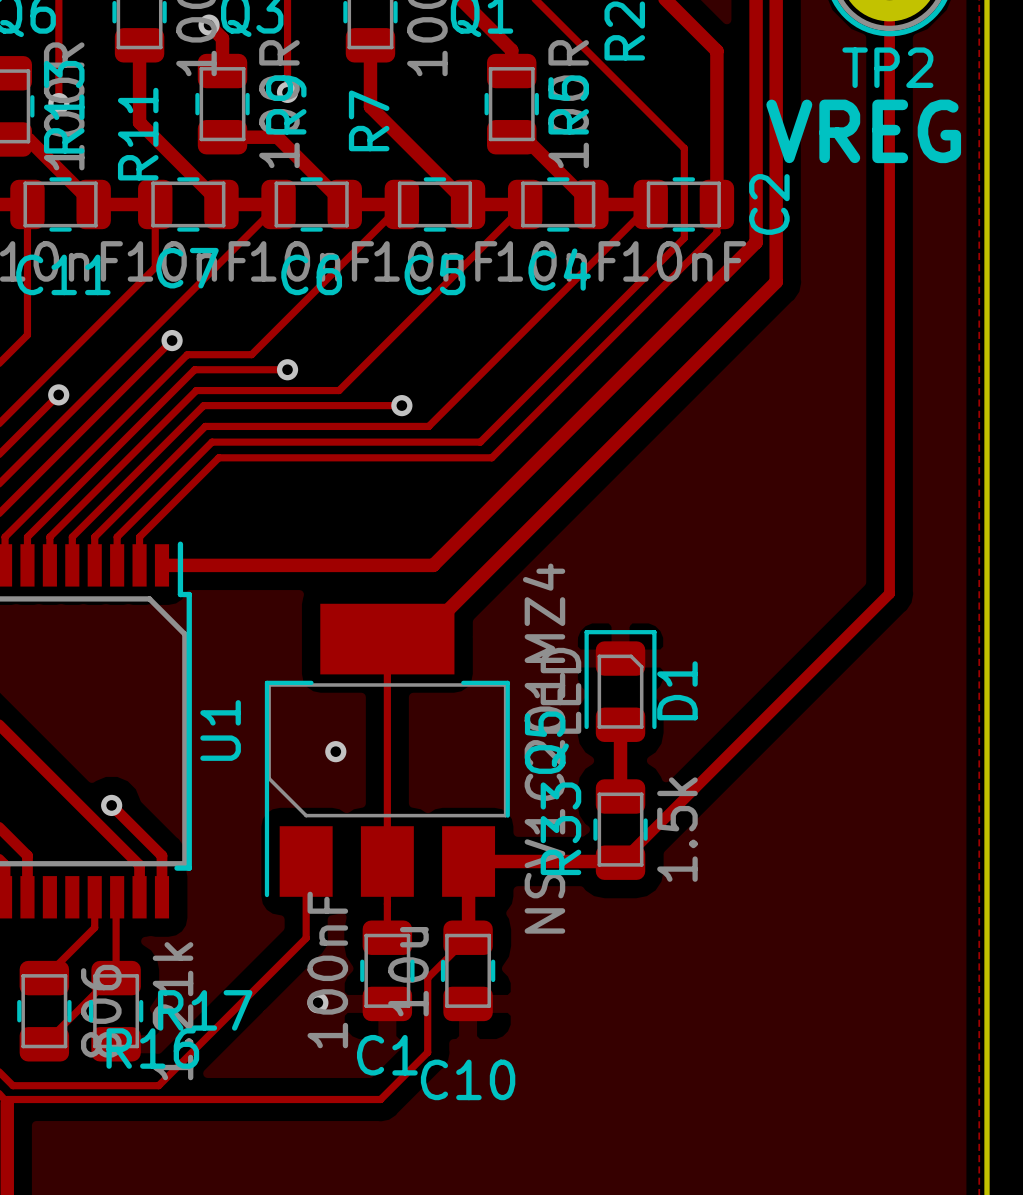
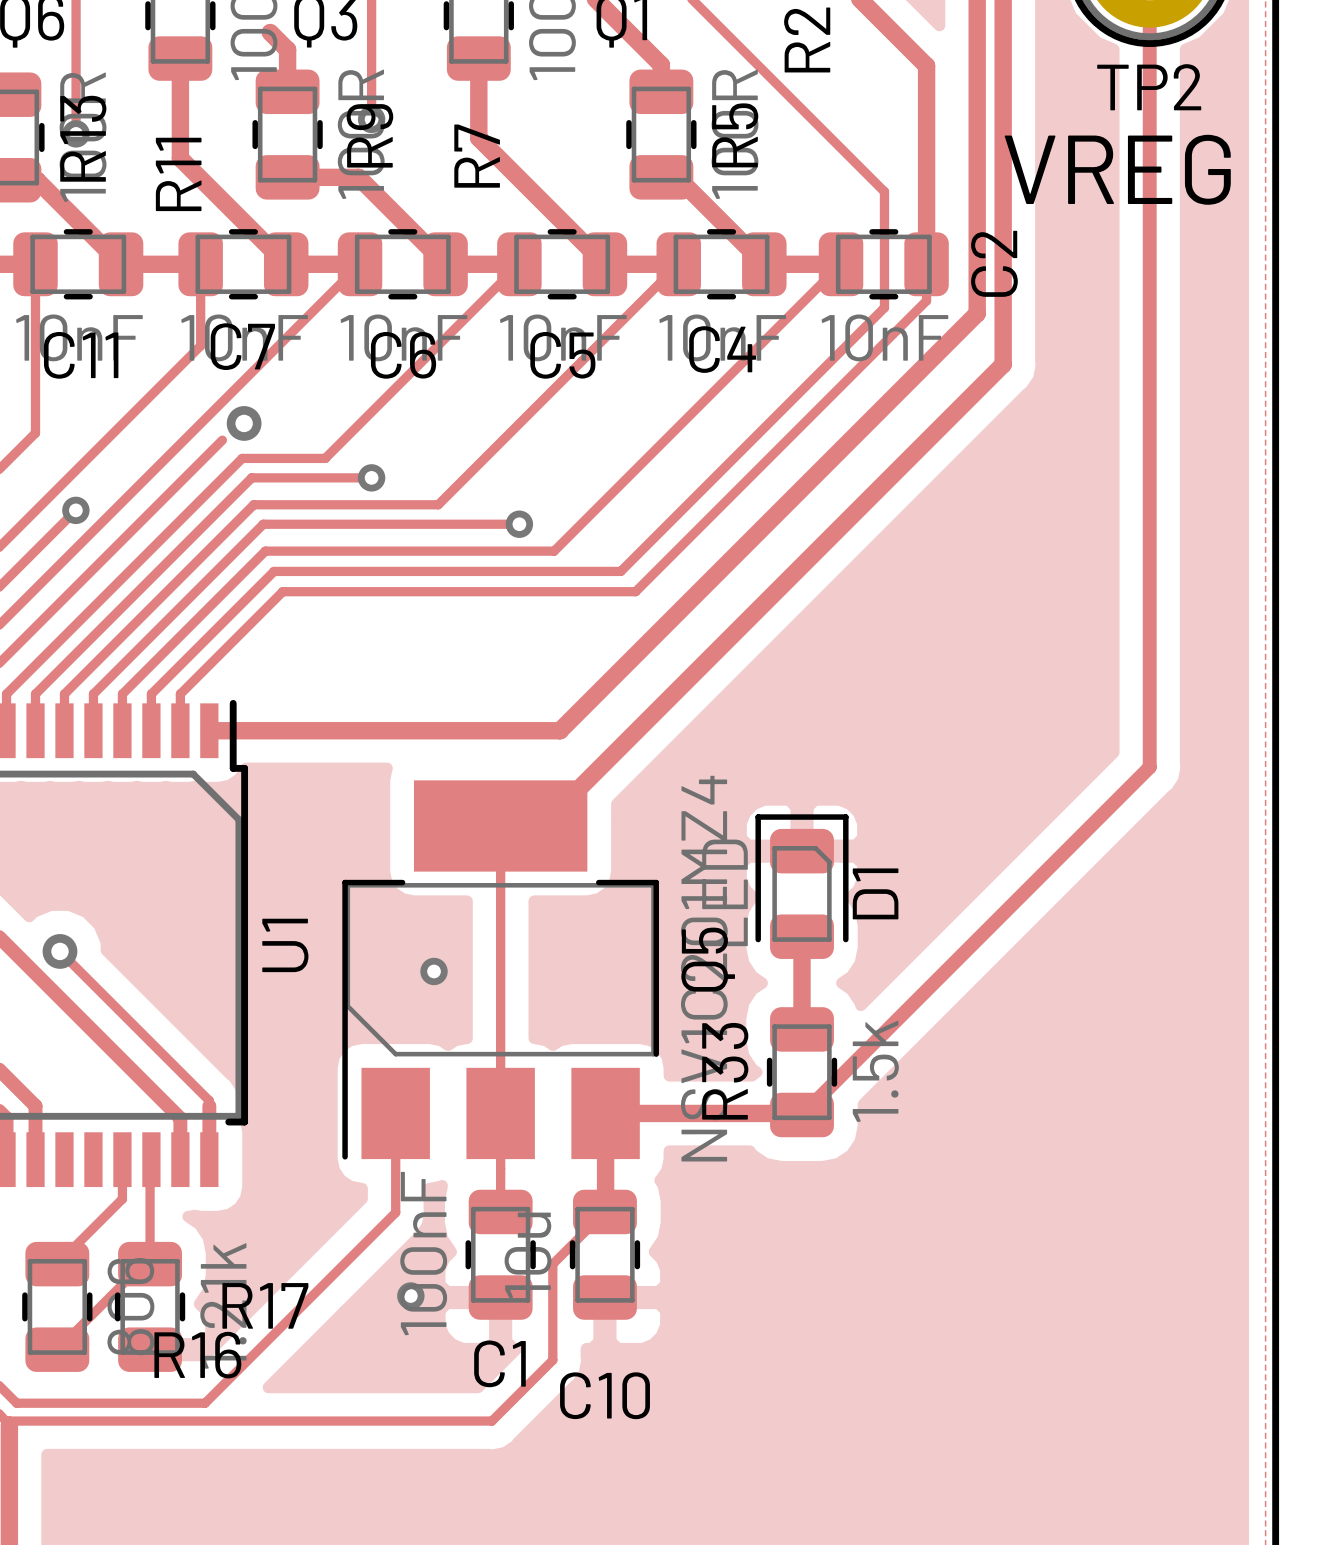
via: (209, 25) -> none
via position: (172, 340) -> (244, 423)
via: none -> (59, 951)
track: (111, 805) (161, 855) -> (59, 951) (209, 1100) (209, 1106)
via: (111, 805) -> none

